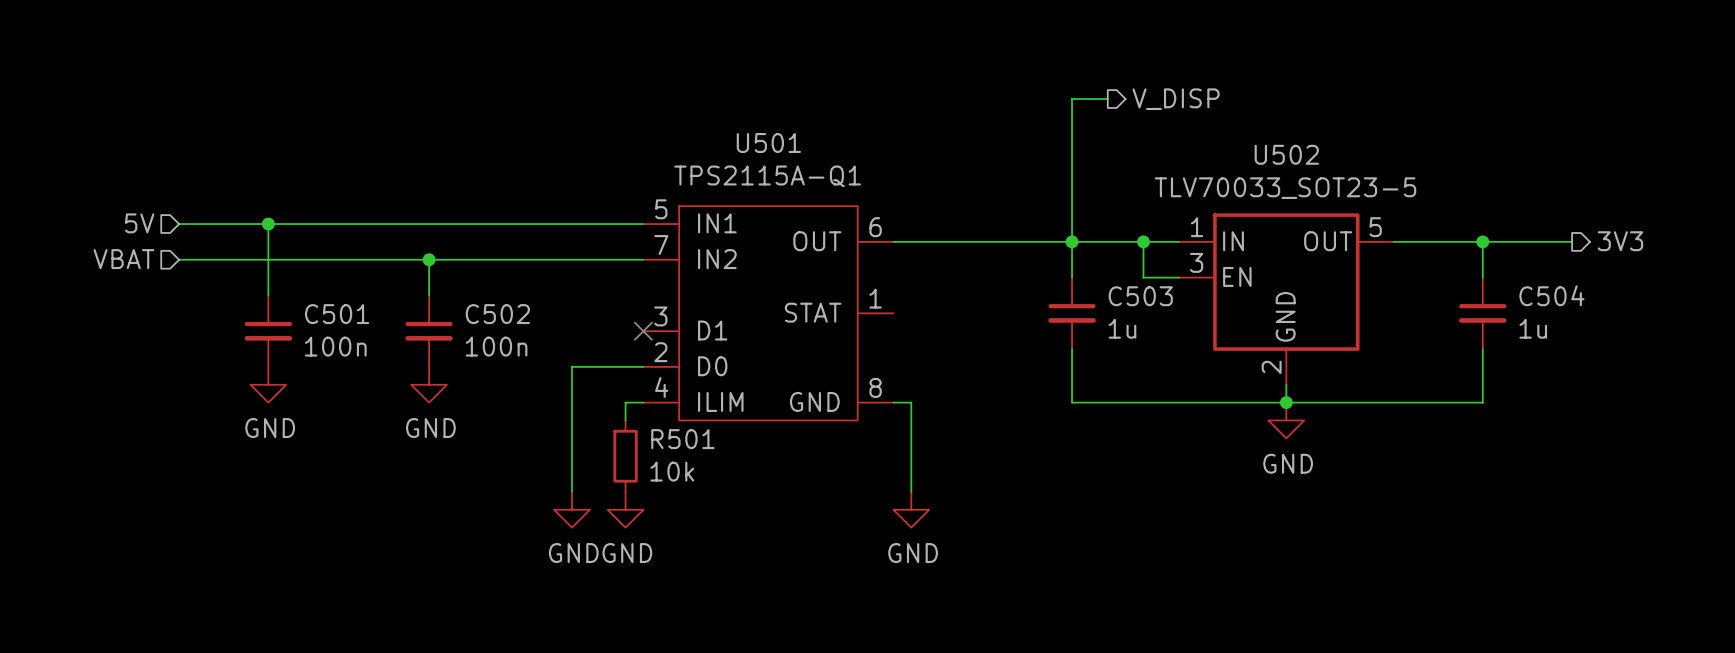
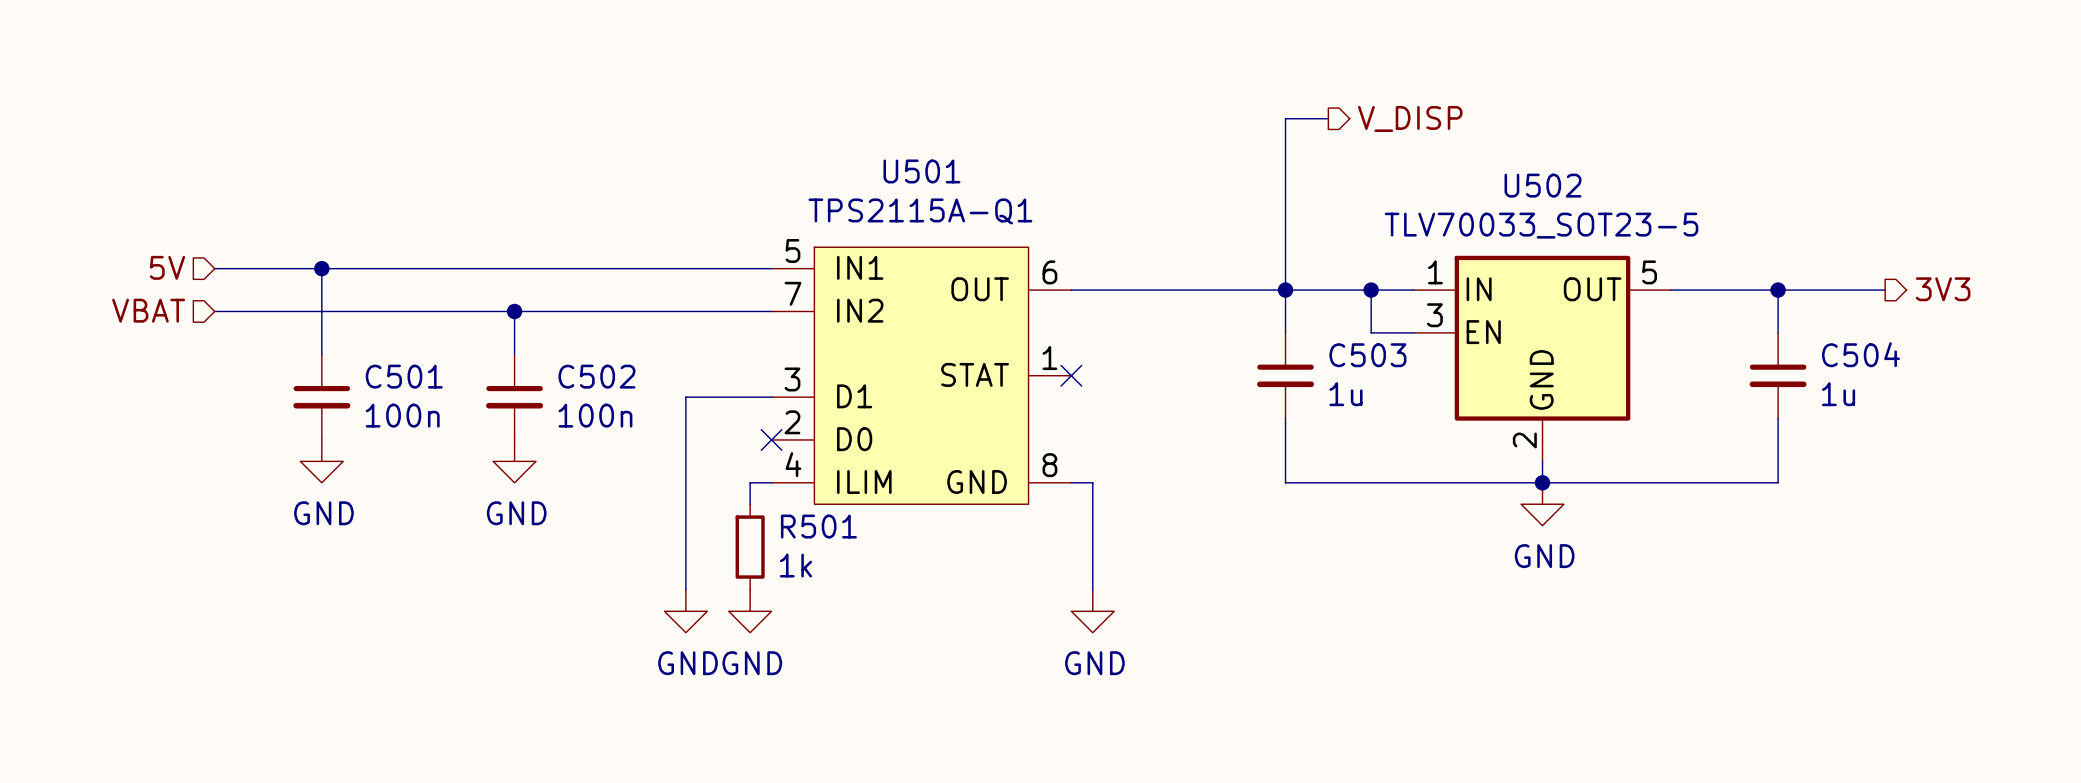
no-connect mark: none -> (1071, 375)
no-connect mark position: (643, 331) -> (771, 439)
wire: (571, 366) (643, 366) -> (685, 439) (685, 397) (771, 397)
R501 value: 10k (672, 471) -> 1k (795, 565)

